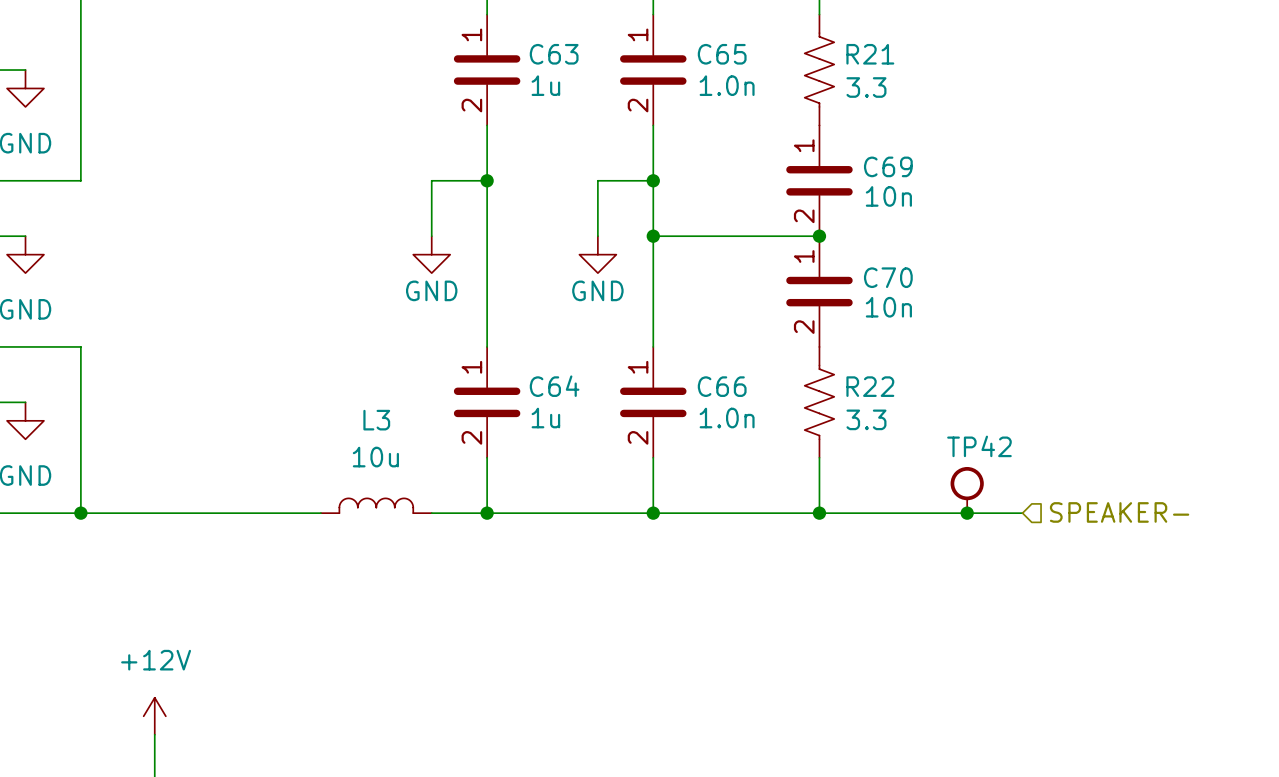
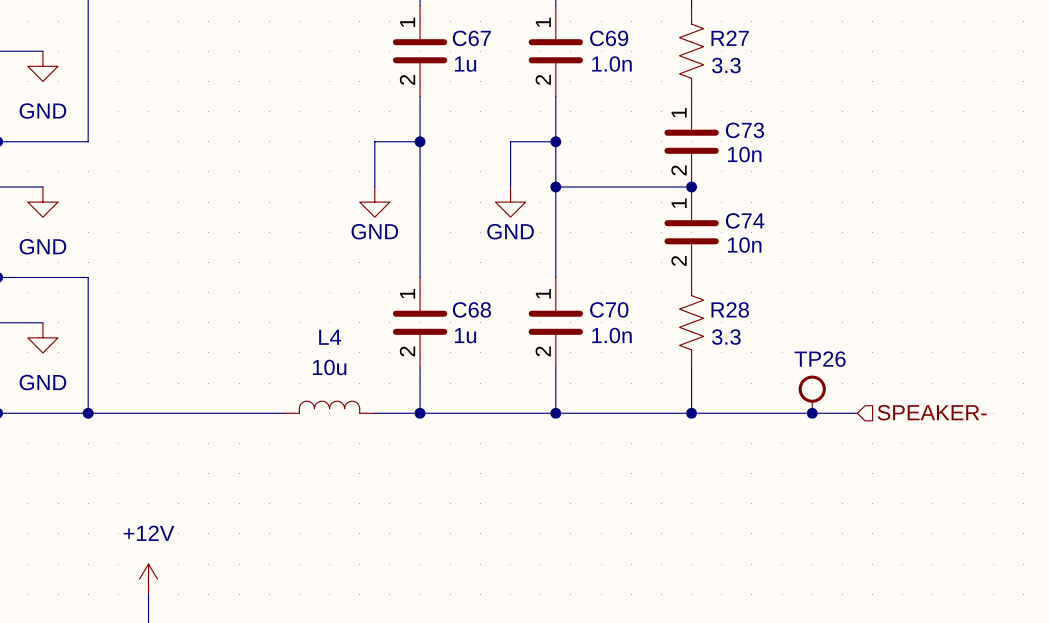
C63 name: C63 (554, 54) -> C67 (471, 38)
C65 name: C65 (722, 54) -> C69 (609, 38)
R21 name: R21 (870, 54) -> R27 (730, 38)
C69 name: C69 (888, 166) -> C73 (744, 130)
C70 name: C70 (888, 277) -> C74 (745, 220)
C64 name: C64 (554, 386) -> C68 (471, 309)
C66 name: C66 (722, 386) -> C70 (609, 309)
R22 name: R22 (870, 386) -> R28 (730, 309)
L3 name: L3 (376, 420) -> L4 (330, 337)
TP42 name: TP42 (979, 446) -> TP26 (820, 359)

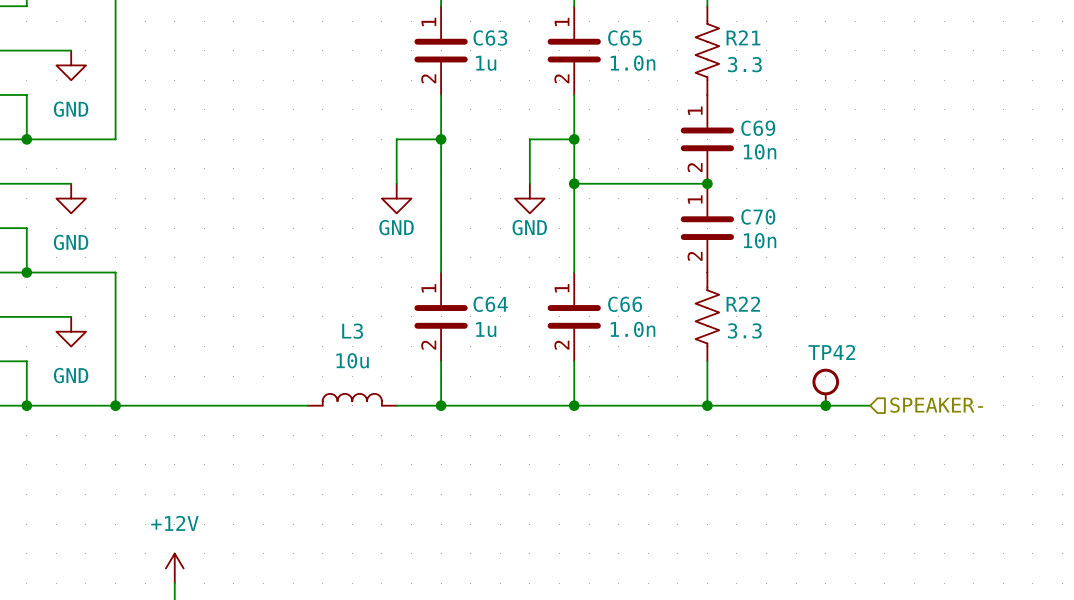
C67 name: C67 (471, 38) -> C63 (490, 38)
C69 name: C69 (609, 38) -> C65 (624, 38)
R27 name: R27 (730, 38) -> R21 (743, 37)
C73 name: C73 (744, 130) -> C69 (758, 128)
C74 name: C74 (745, 220) -> C70 (758, 217)
C68 name: C68 (471, 309) -> C64 (490, 304)
C70 name: C70 (609, 309) -> C66 (625, 304)
R28 name: R28 (730, 309) -> R22 (743, 304)
L4 name: L4 (330, 337) -> L3 (352, 331)
TP26 name: TP26 (820, 359) -> TP42 (831, 352)

